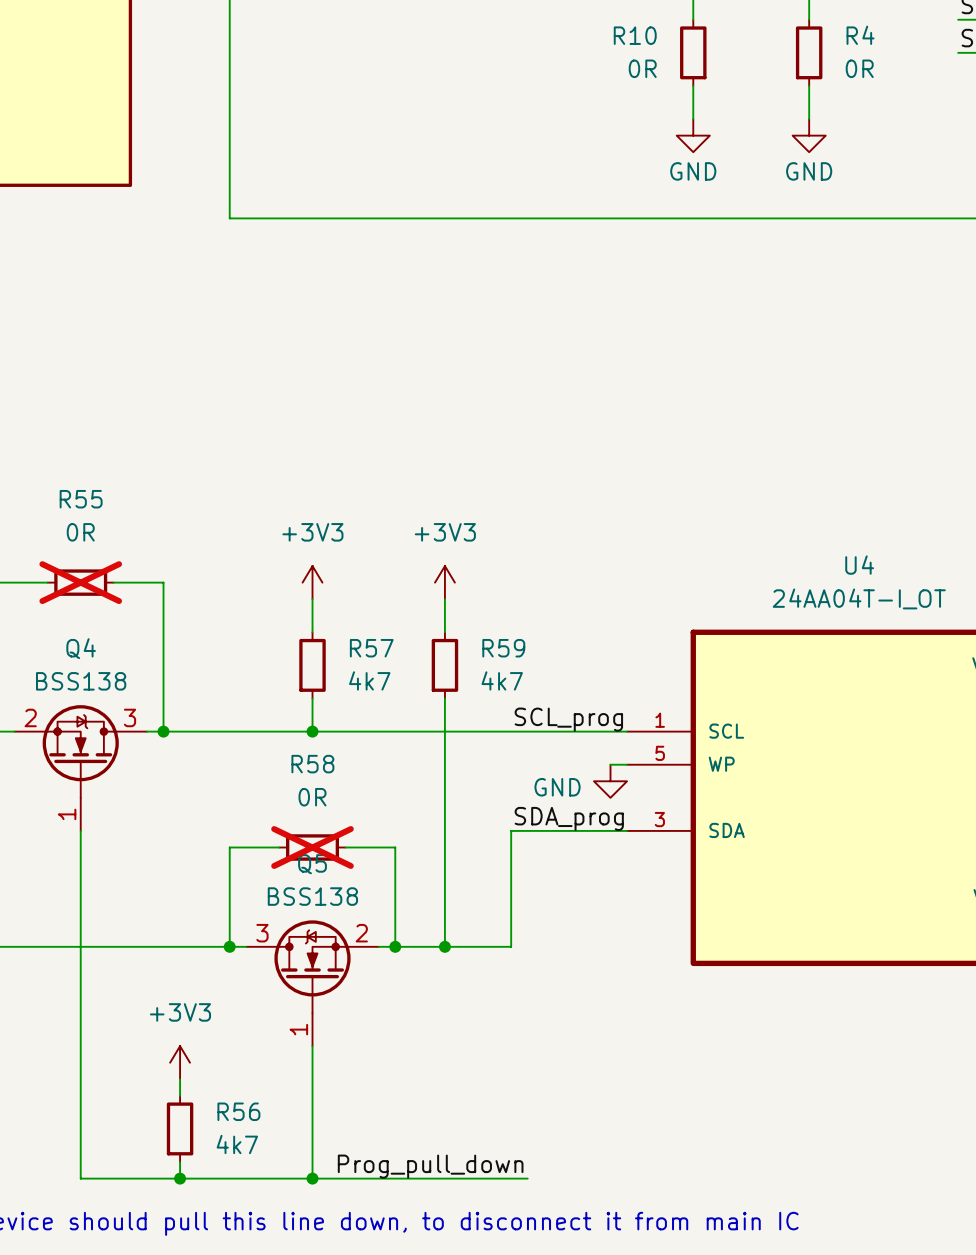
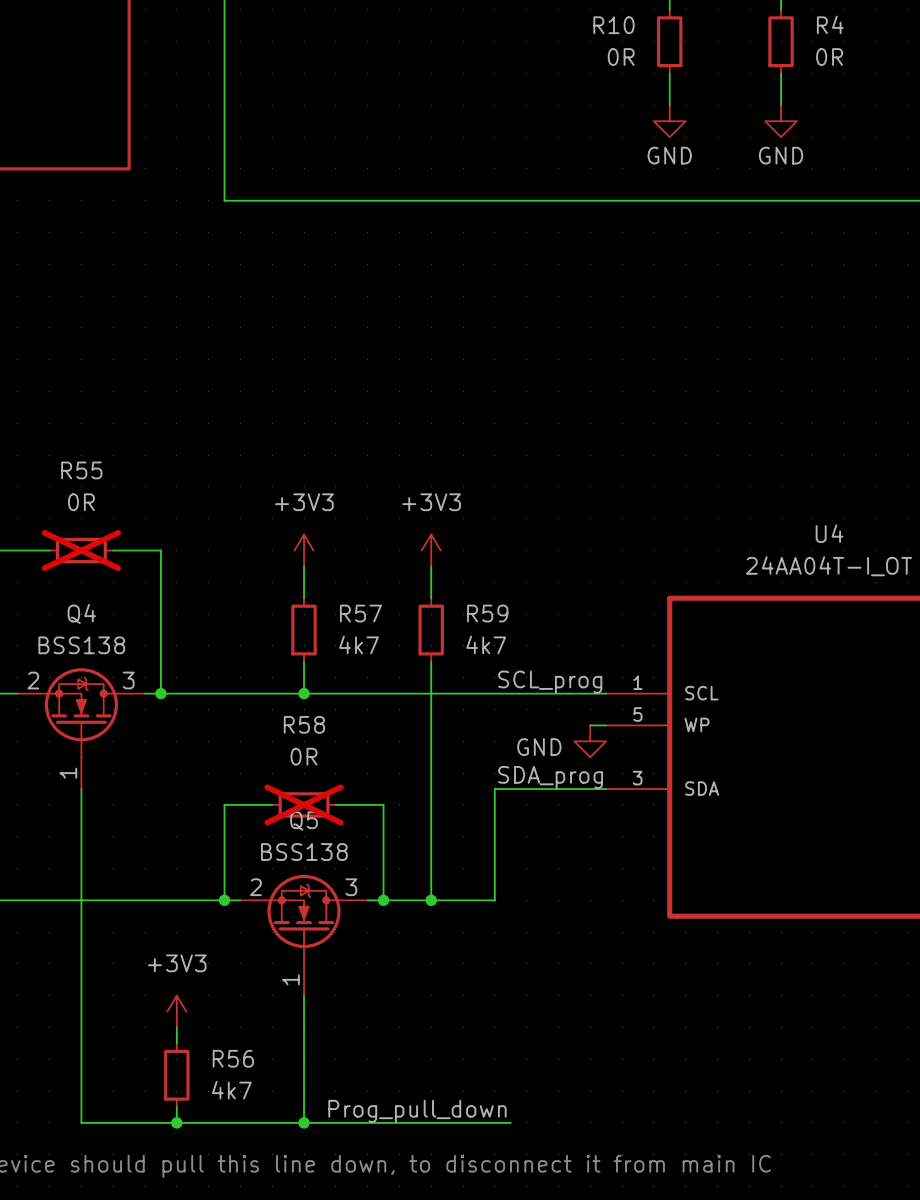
Q5 flip: as is (312, 966) -> left-right (304, 919)

